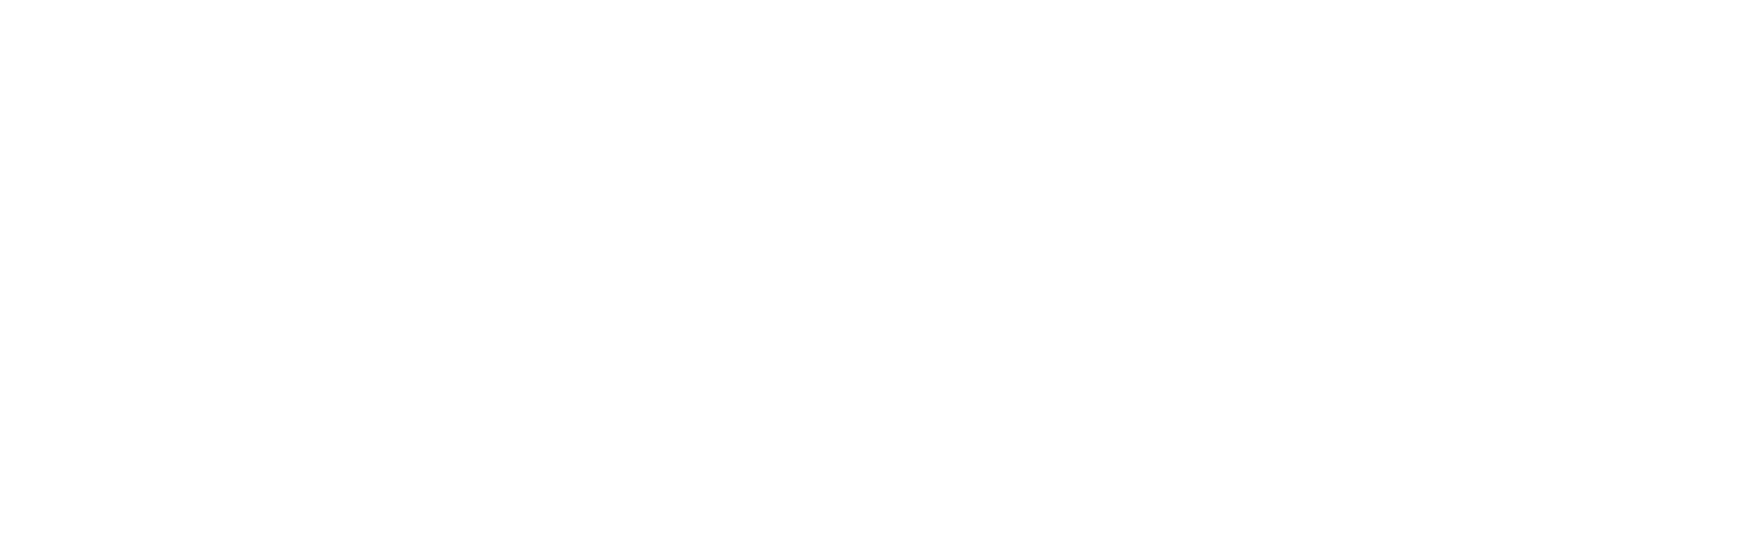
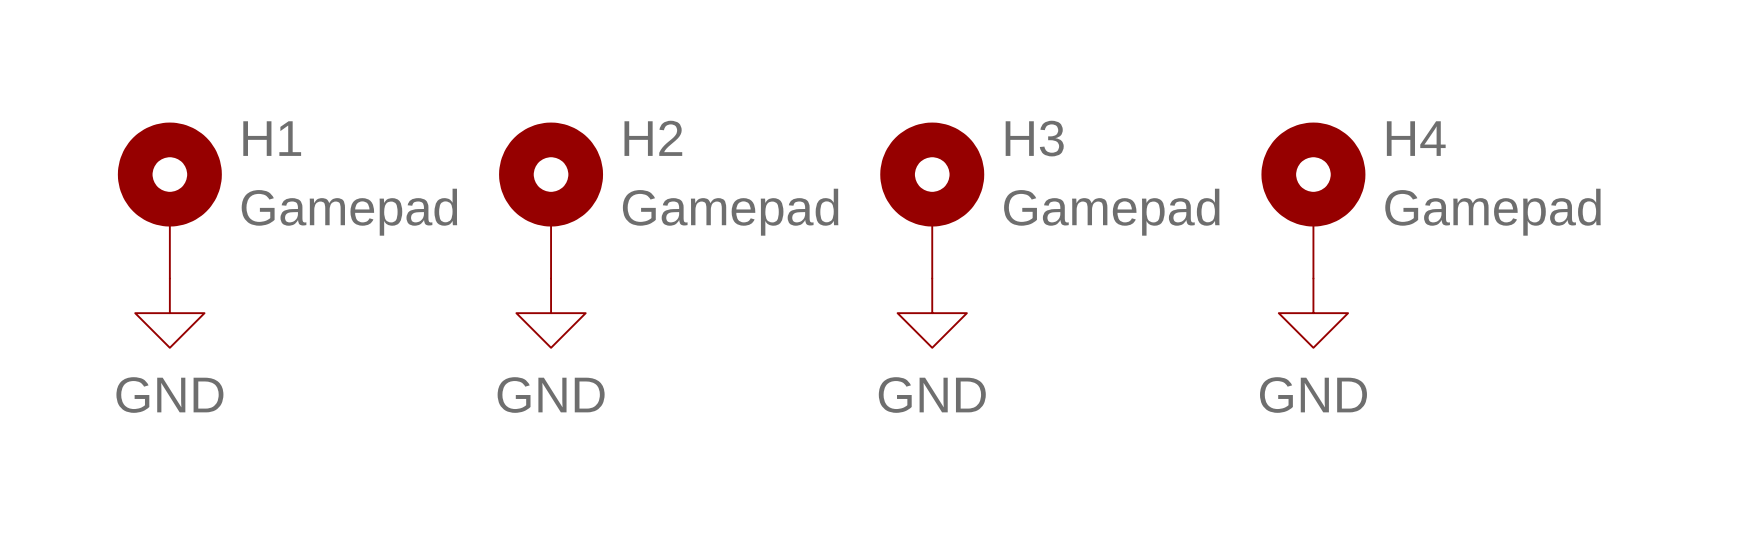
H1: none -> Gamepad (169, 200)
H2: none -> Gamepad (551, 200)
H3: none -> Gamepad (932, 200)
H4: none -> Gamepad (1313, 200)
power symbol: none -> GND (169, 313)
power symbol: none -> GND (551, 313)
power symbol: none -> GND (932, 313)
power symbol: none -> GND (1313, 313)

